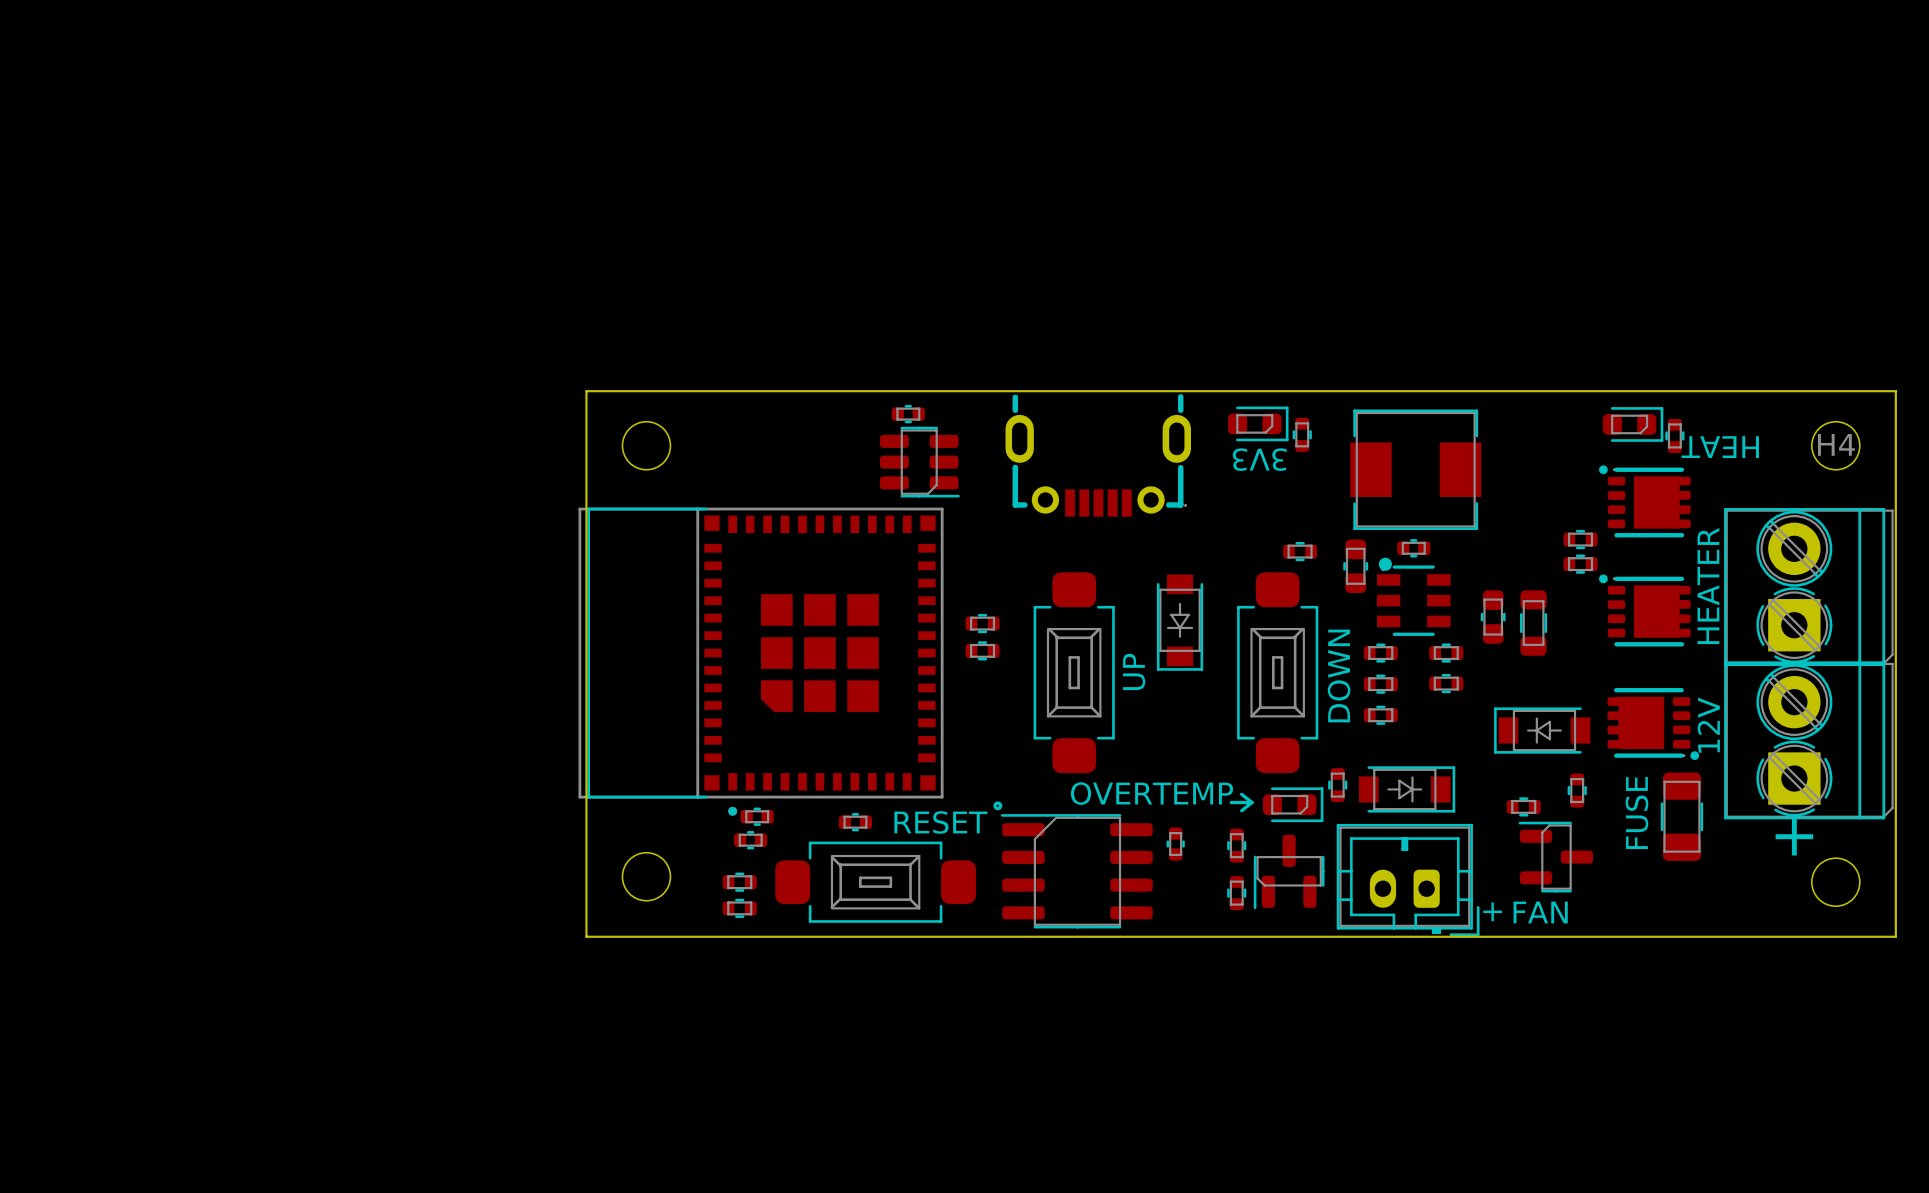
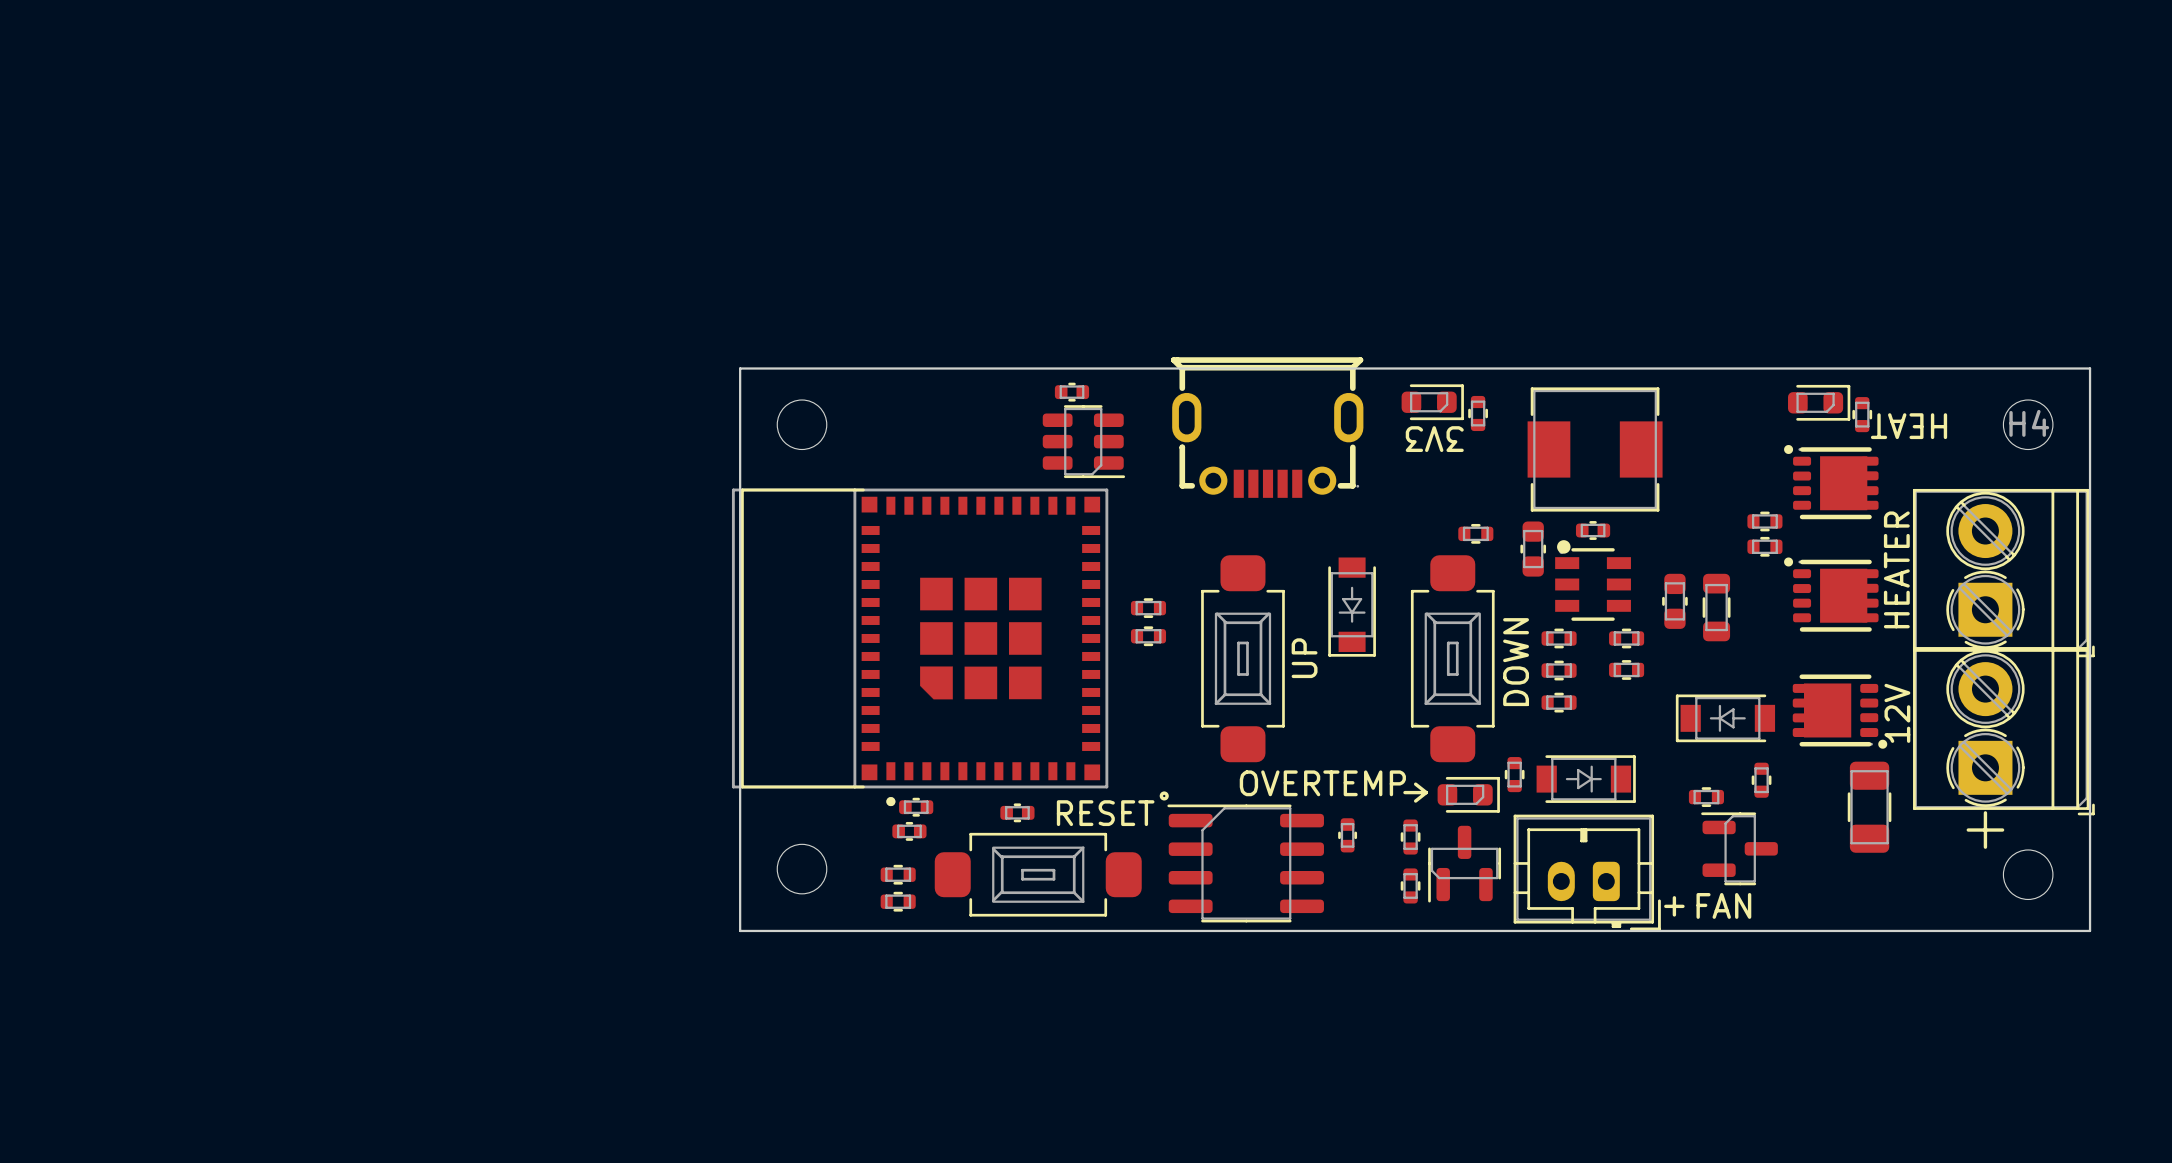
part footprint: [1005, 394, 1192, 517] -> [1170, 357, 1364, 498]
part footprint: [1724, 508, 1894, 667] -> [1912, 488, 2095, 658]
part footprint: [1724, 661, 1894, 820] -> [1913, 647, 2095, 816]
text: FUSE (1636, 812) -> none

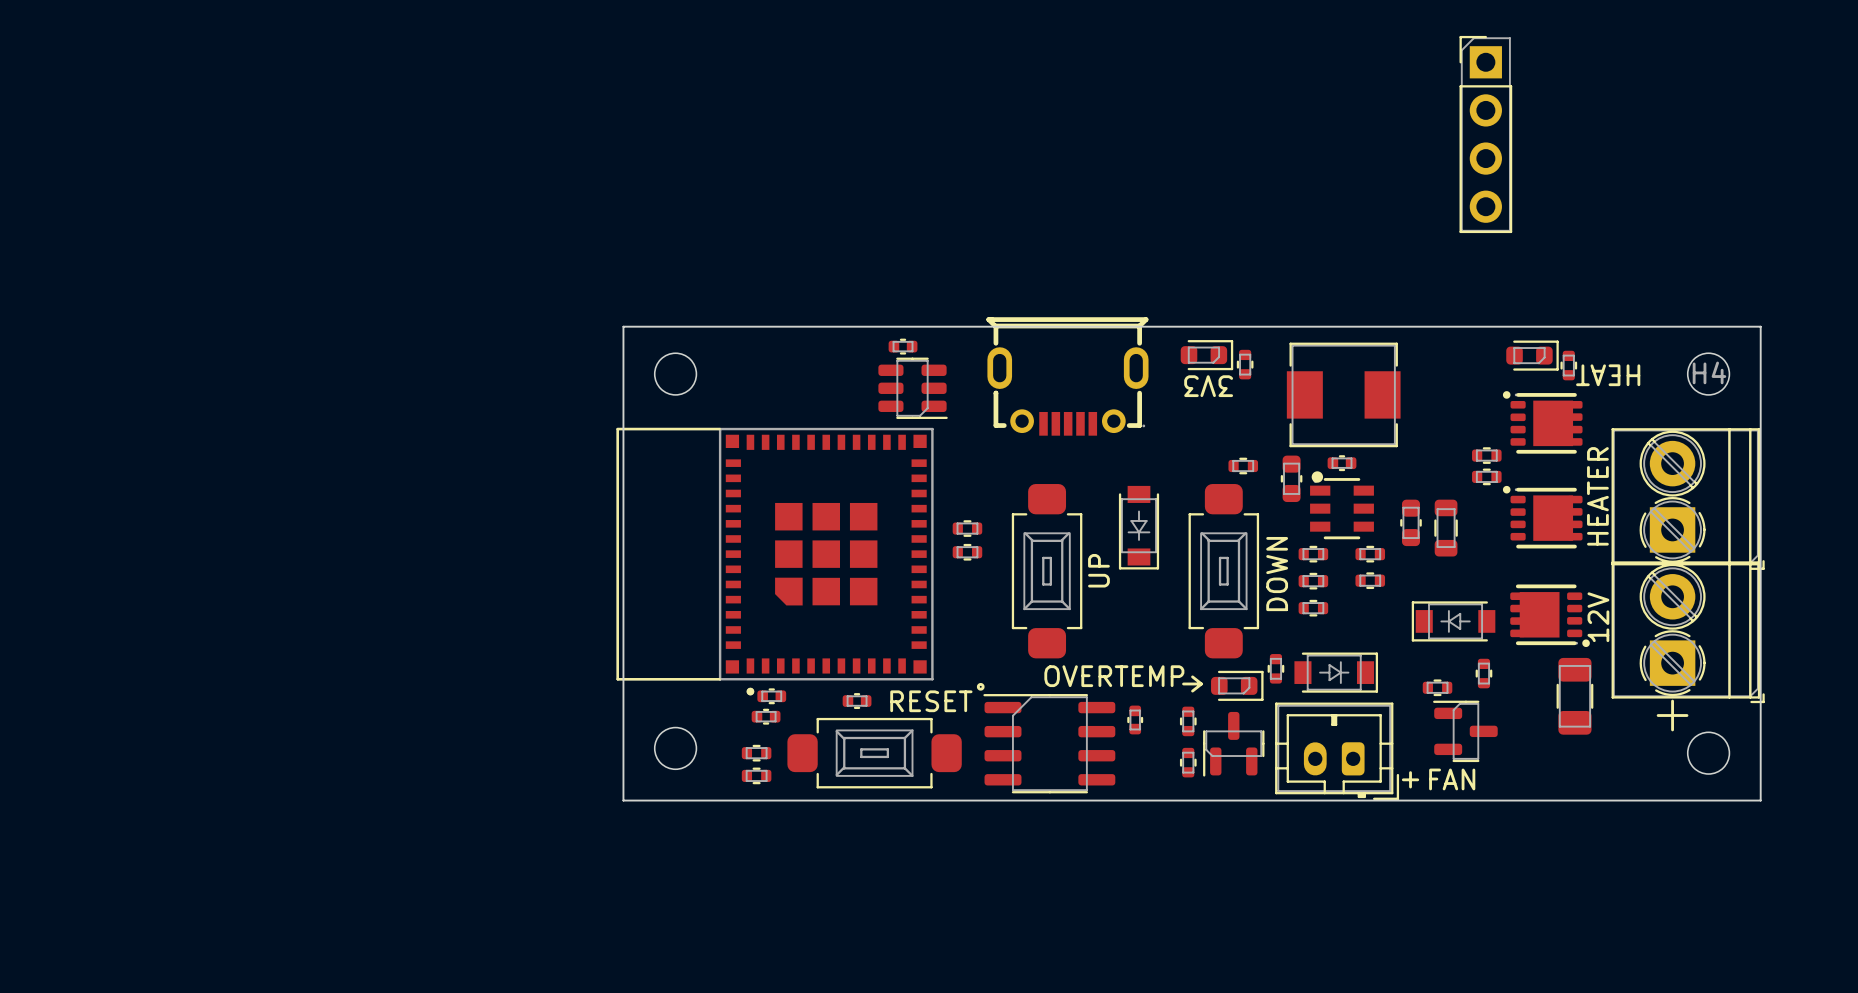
part: none -> (1485, 134)
part footprint: [731, 488, 1109, 807] -> [616, 427, 934, 696]

